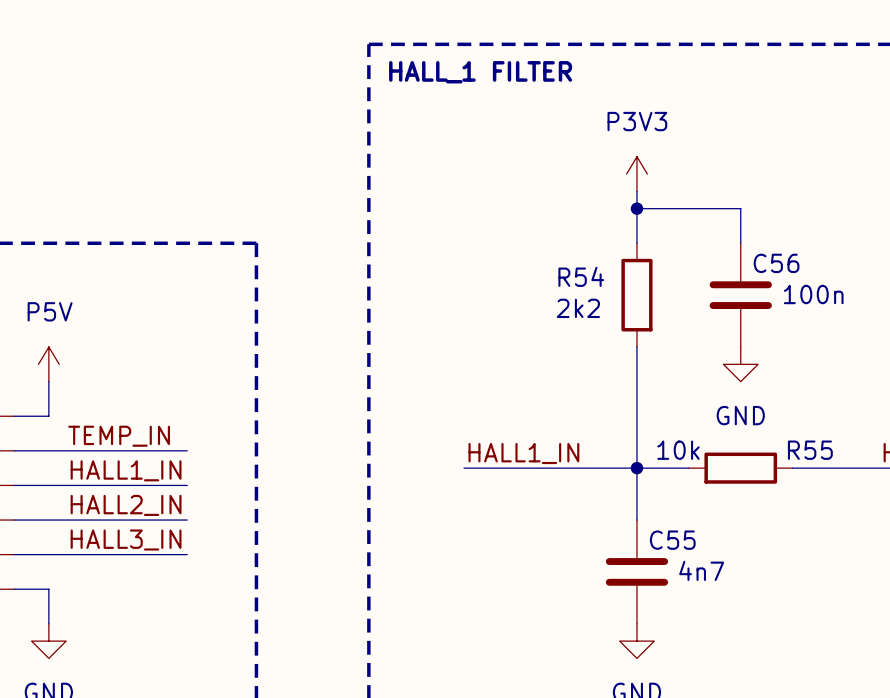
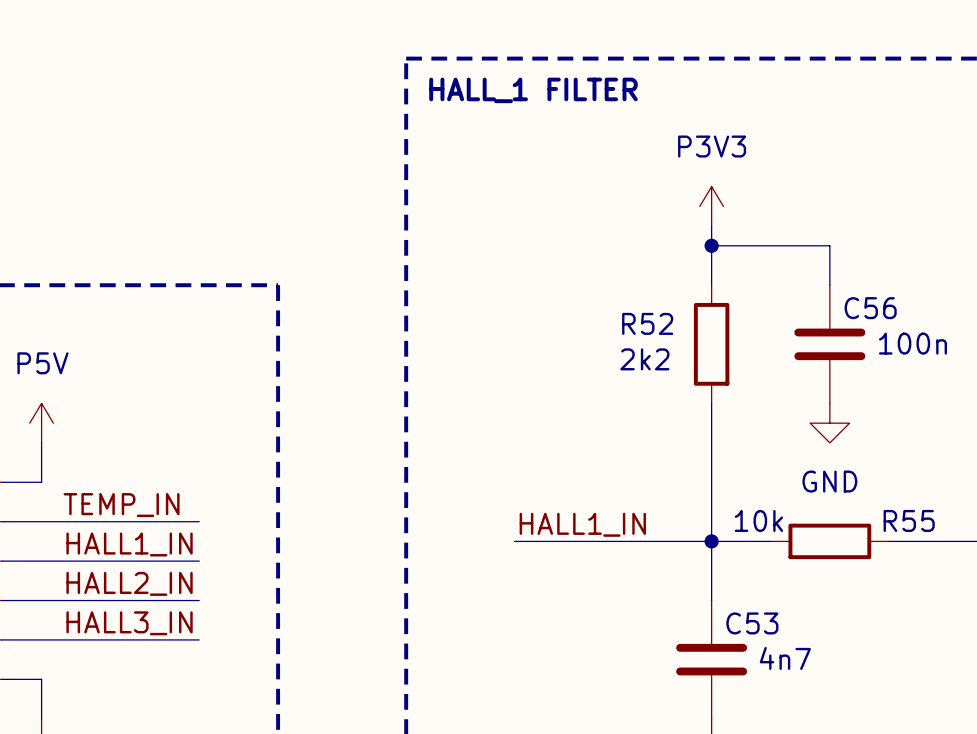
R54 name: R54 (581, 276) -> R52 (647, 323)
C55 name: C55 (672, 540) -> C53 (752, 623)

